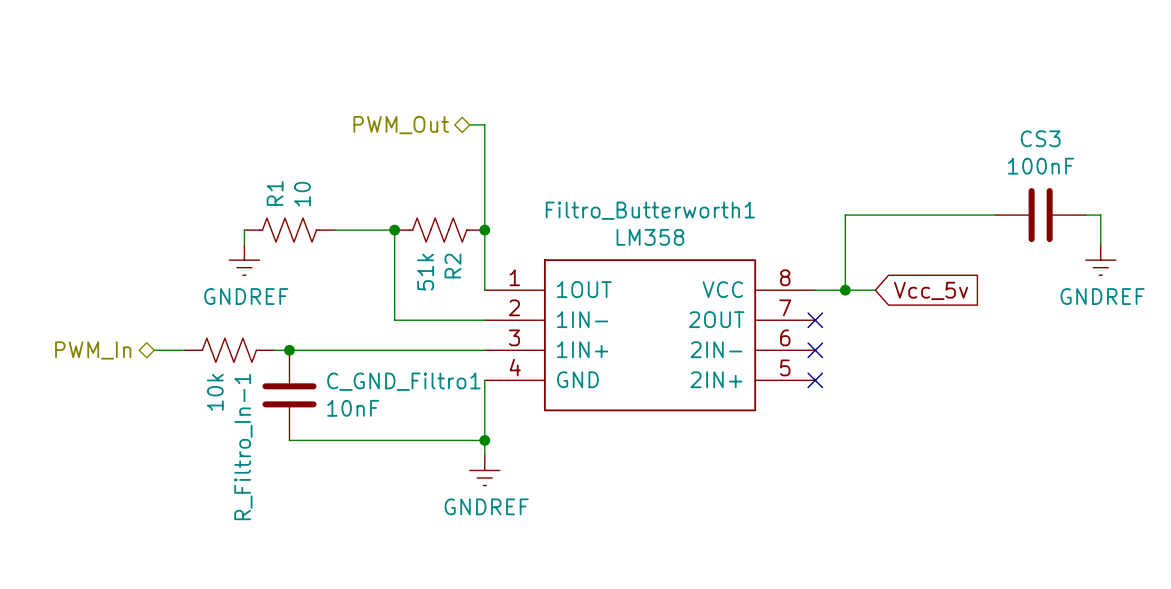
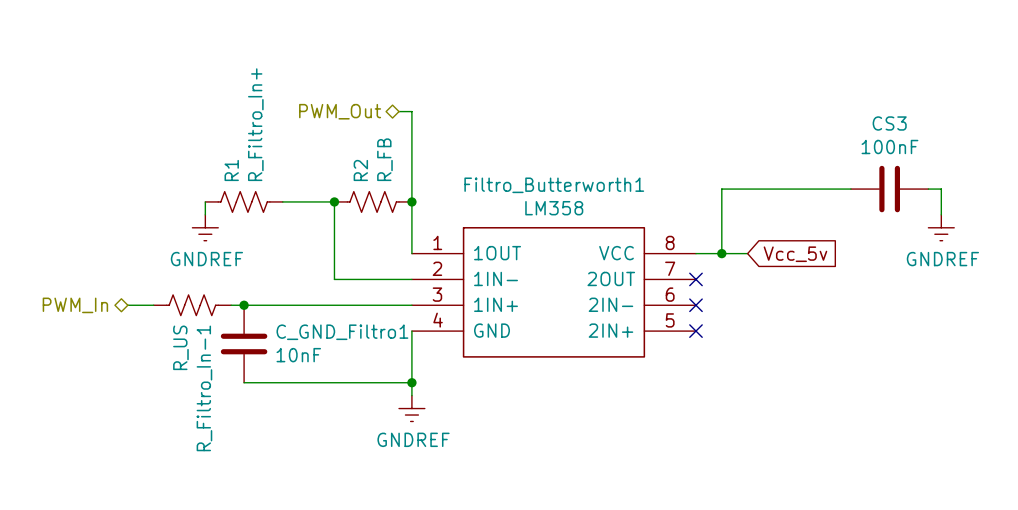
R1 value: 10 (302, 194) -> R_Filtro_In+ (255, 124)
R2 name position: R2 (452, 266) -> R2 (360, 170)
R2 value: 51k (425, 272) -> R_FB (384, 159)
R_Filtro_In-1 value: 10k (215, 392) -> R_US (180, 347)

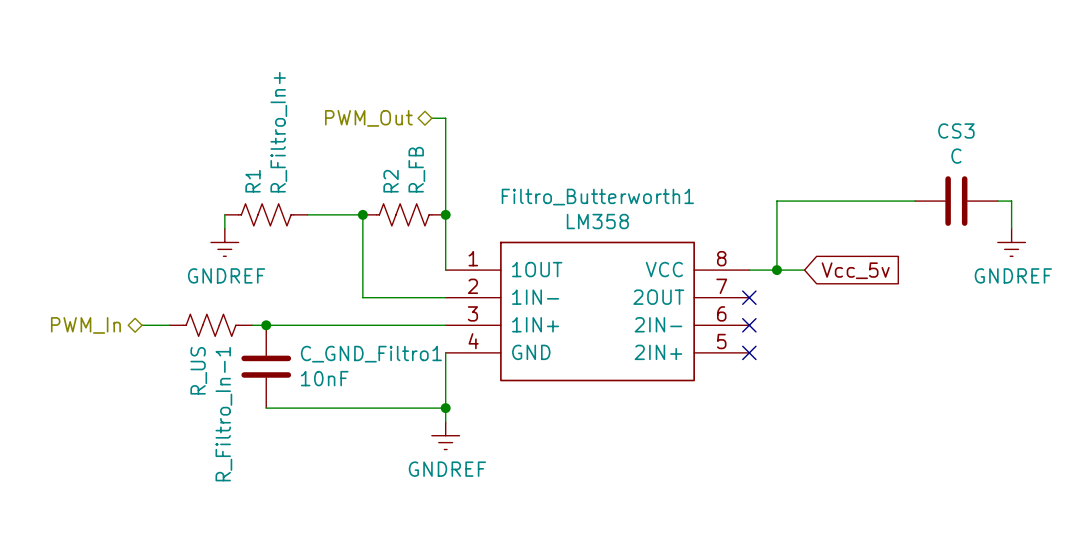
CS3 value: 100nF (889, 146) -> C (956, 156)

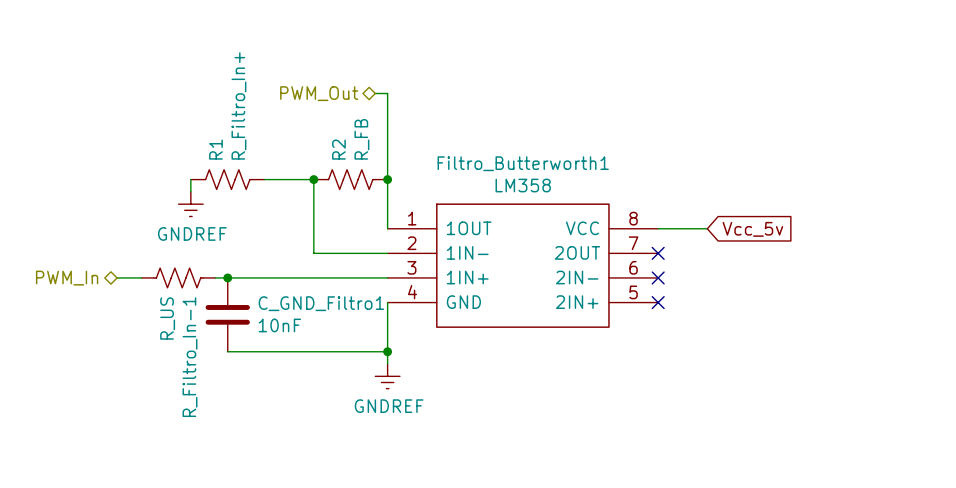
wire: (914, 201) (776, 201) (776, 270) -> none
CS3: C (956, 201) -> none
wire: (997, 201) (1011, 201) (1011, 228) -> none
power symbol: GNDREF (1011, 242) -> none
junction: (776, 270) -> none

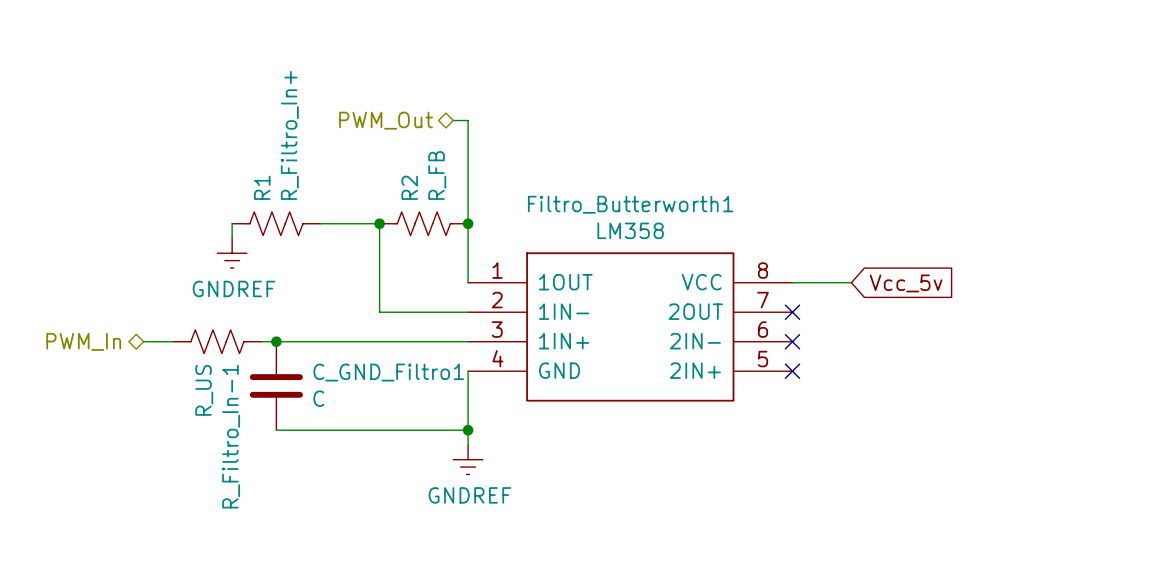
C_GND_Filtro1 value: 10nF (279, 325) -> C (318, 398)

